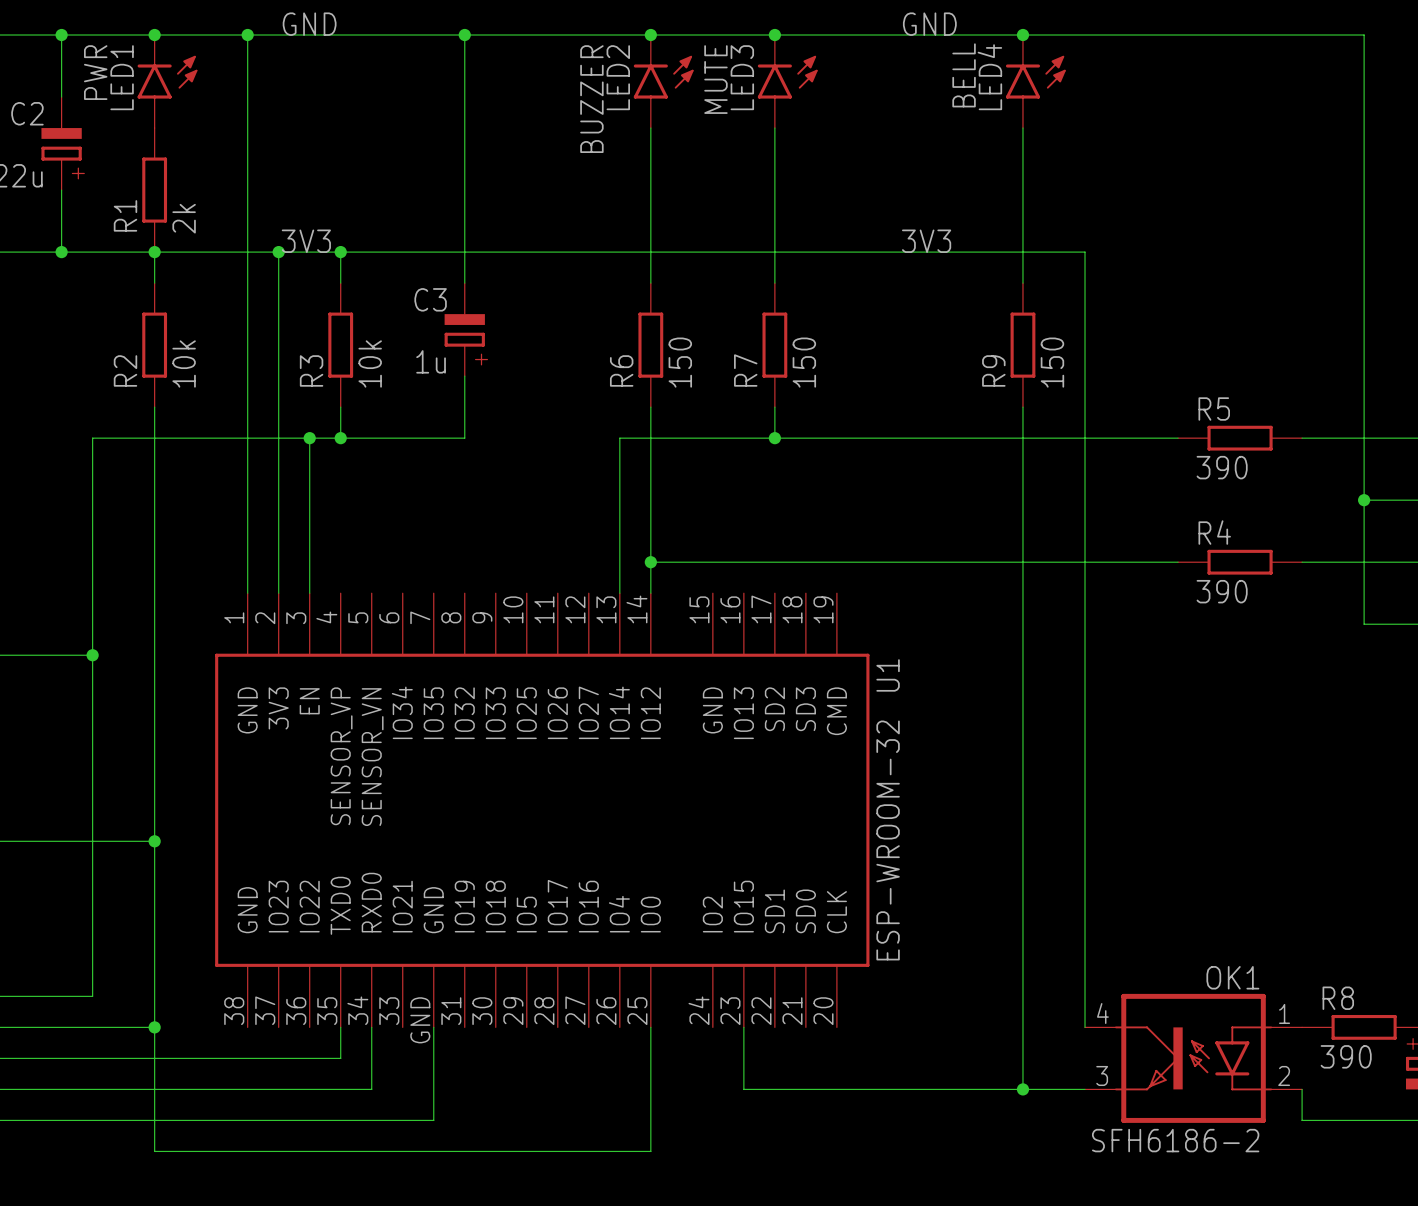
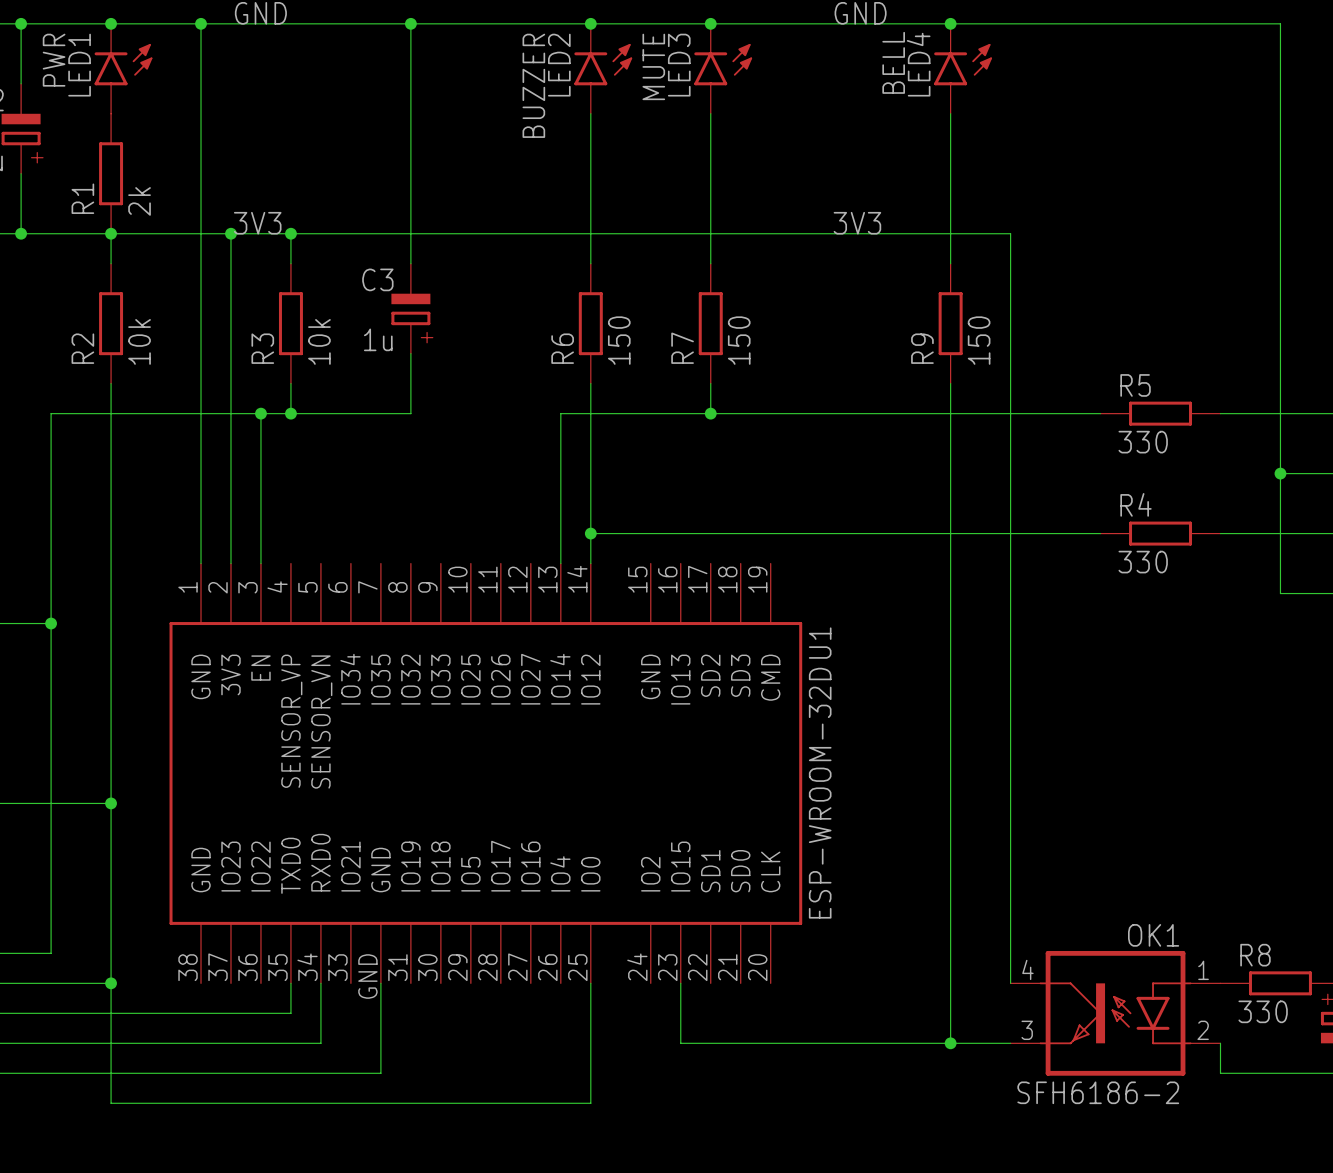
R5 value: 390 (1222, 467) -> 330 (1143, 442)
R4 value: 390 (1222, 591) -> 330 (1143, 562)
U1 value: ESP-WROOM-32 (888, 840) -> ESP-WROOM-32D (820, 793)
R8 value: 390 (1346, 1056) -> 330 (1263, 1011)

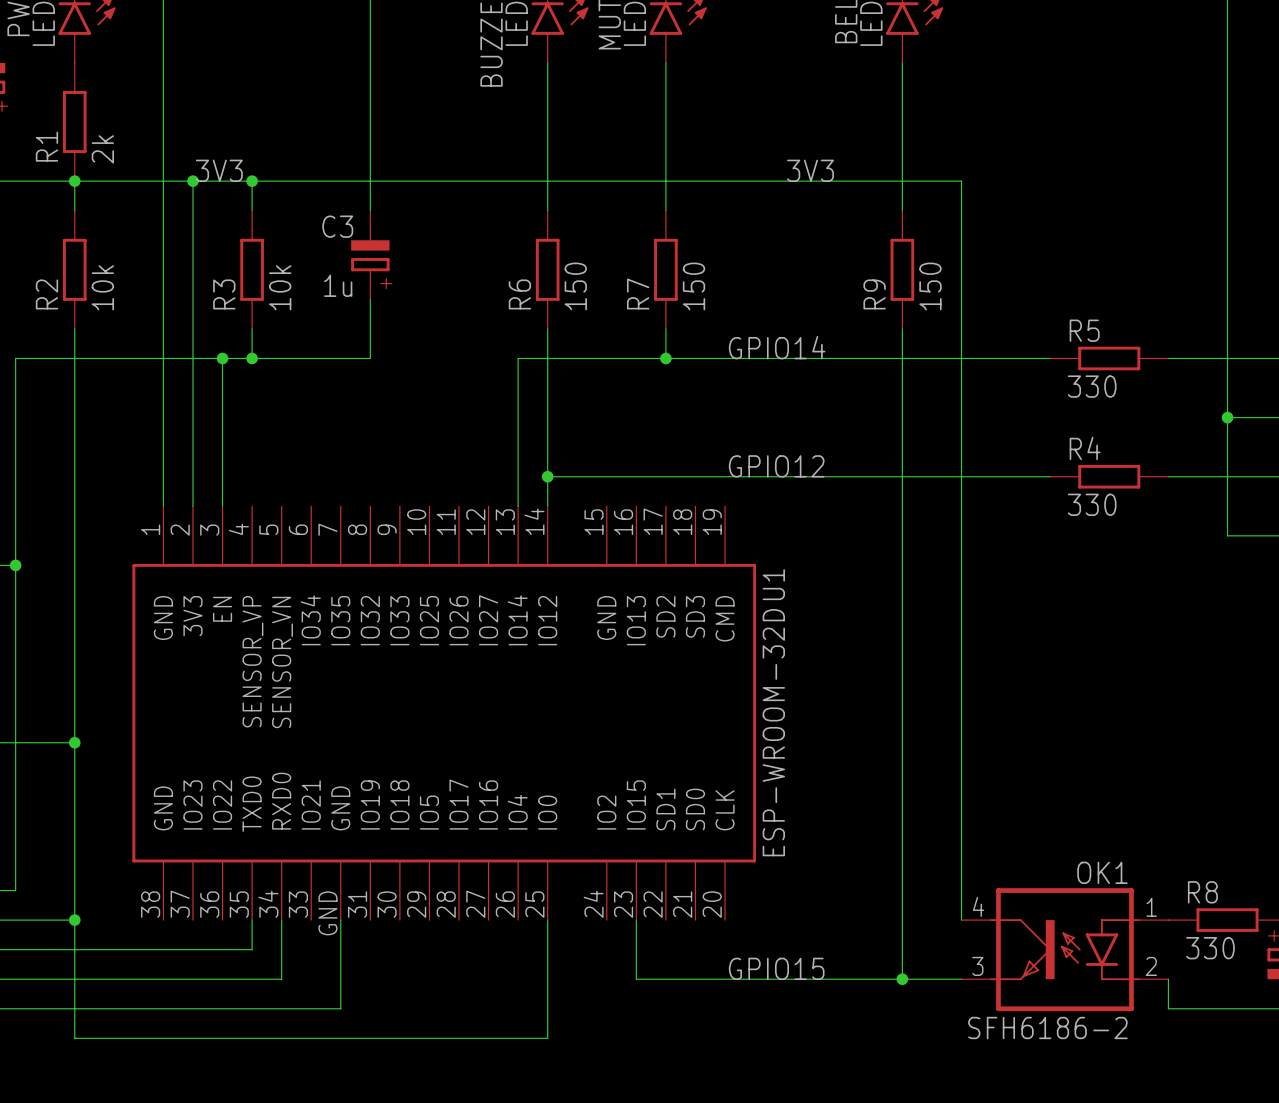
label: none -> GPIO14 (777, 347)
label: none -> GPIO12 (776, 466)
label: none -> GPIO15 (776, 968)

